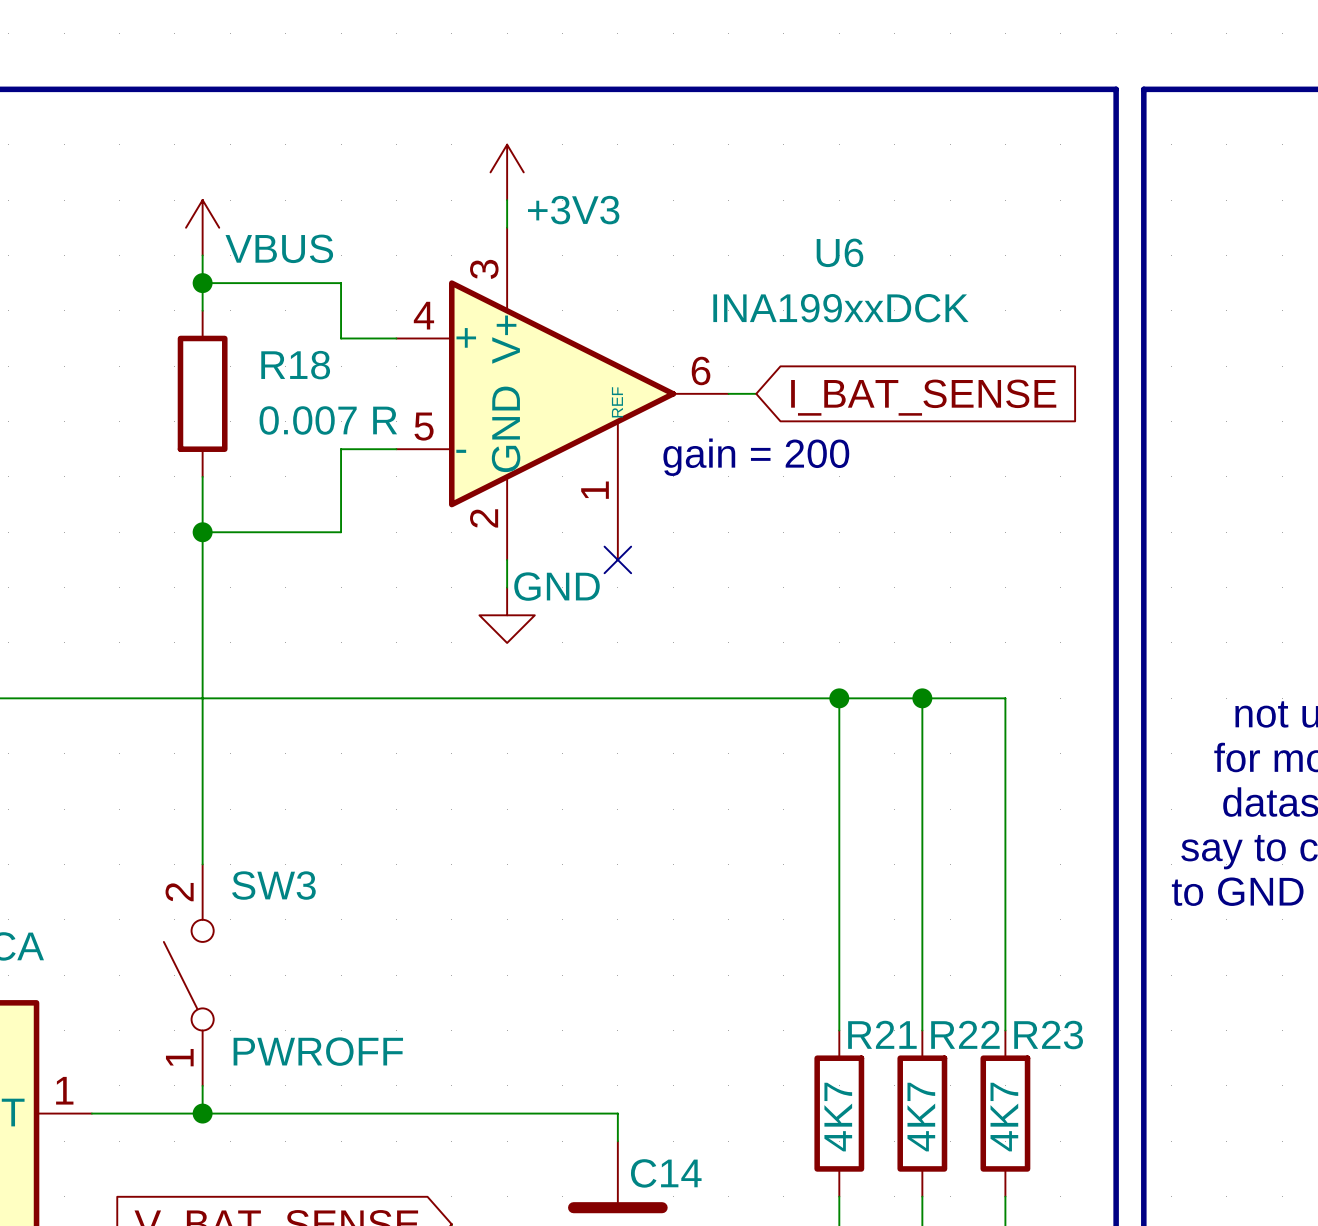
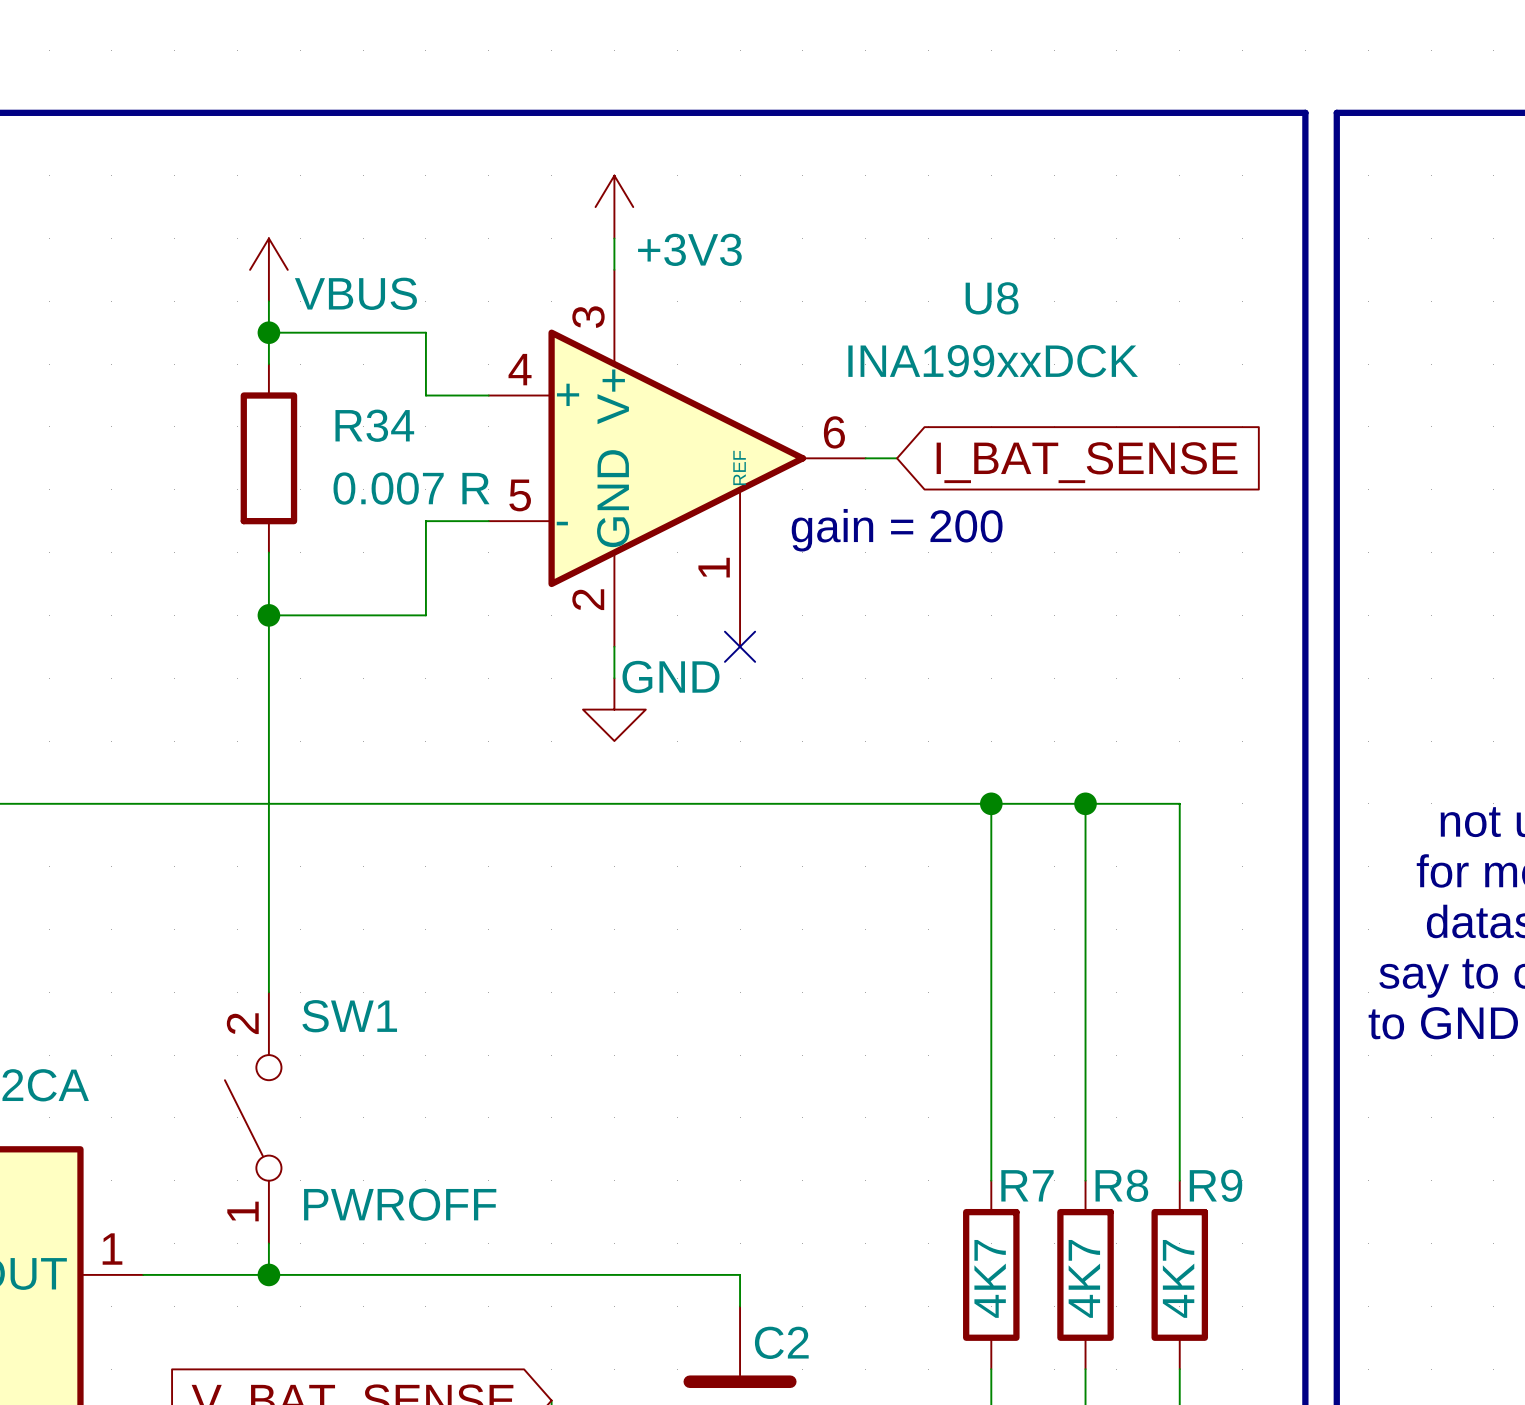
U6 name: U6 (839, 252) -> U8 (992, 298)
R18 name: R18 (295, 365) -> R34 (374, 425)
SW3 name: SW3 (273, 885) -> SW1 (349, 1016)
R21 name: R21 (882, 1034) -> R7 (1027, 1185)
R22 name: R22 (965, 1034) -> R8 (1121, 1185)
R23 name: R23 (1048, 1035) -> R9 (1216, 1185)
C14 name: C14 (666, 1173) -> C2 (781, 1342)

